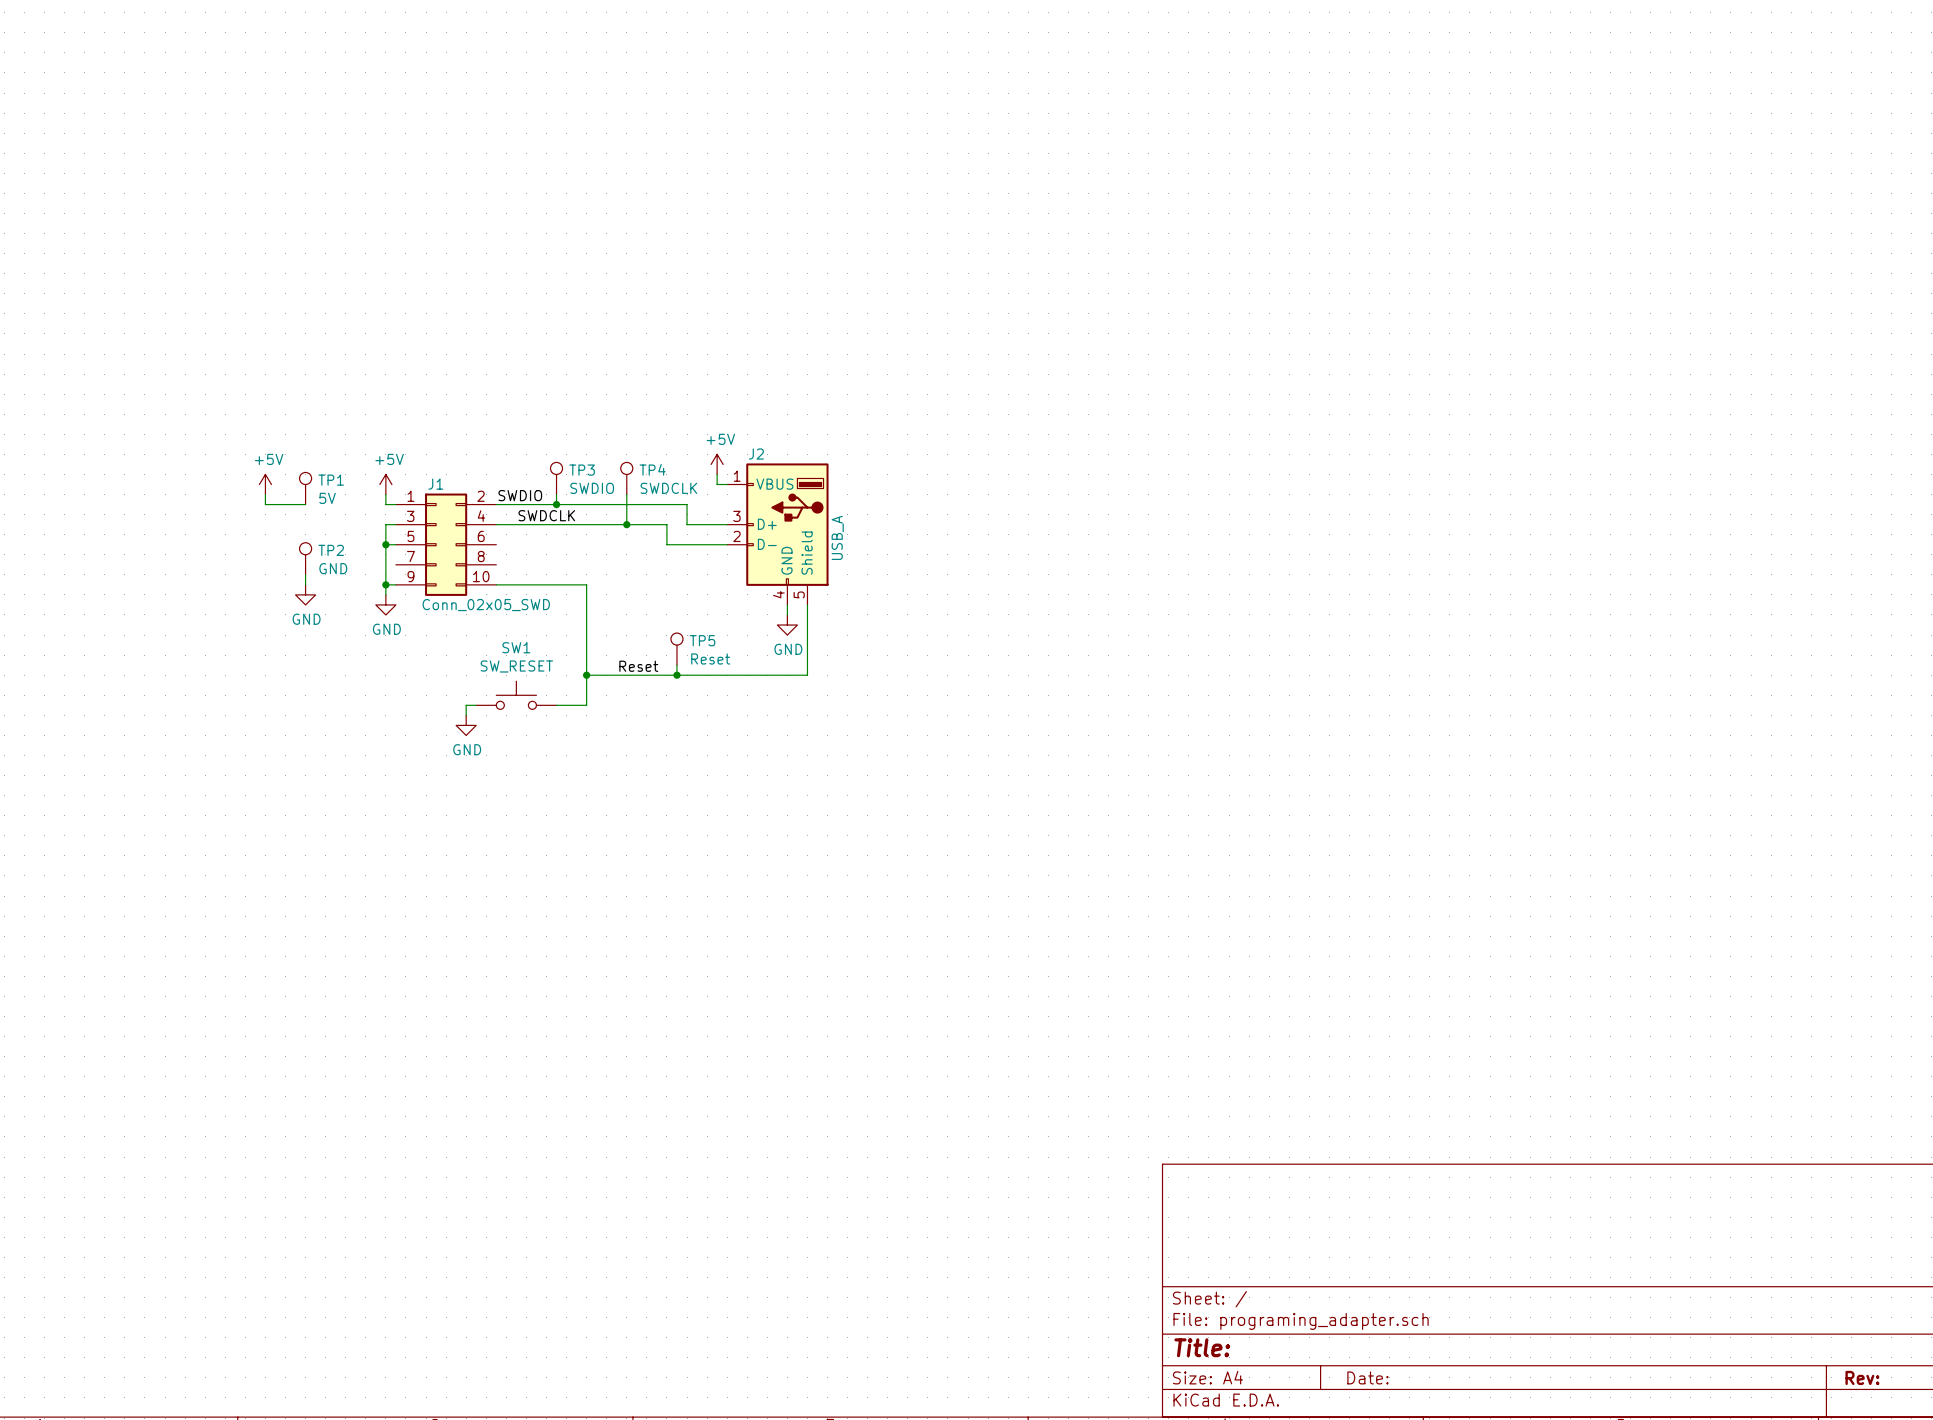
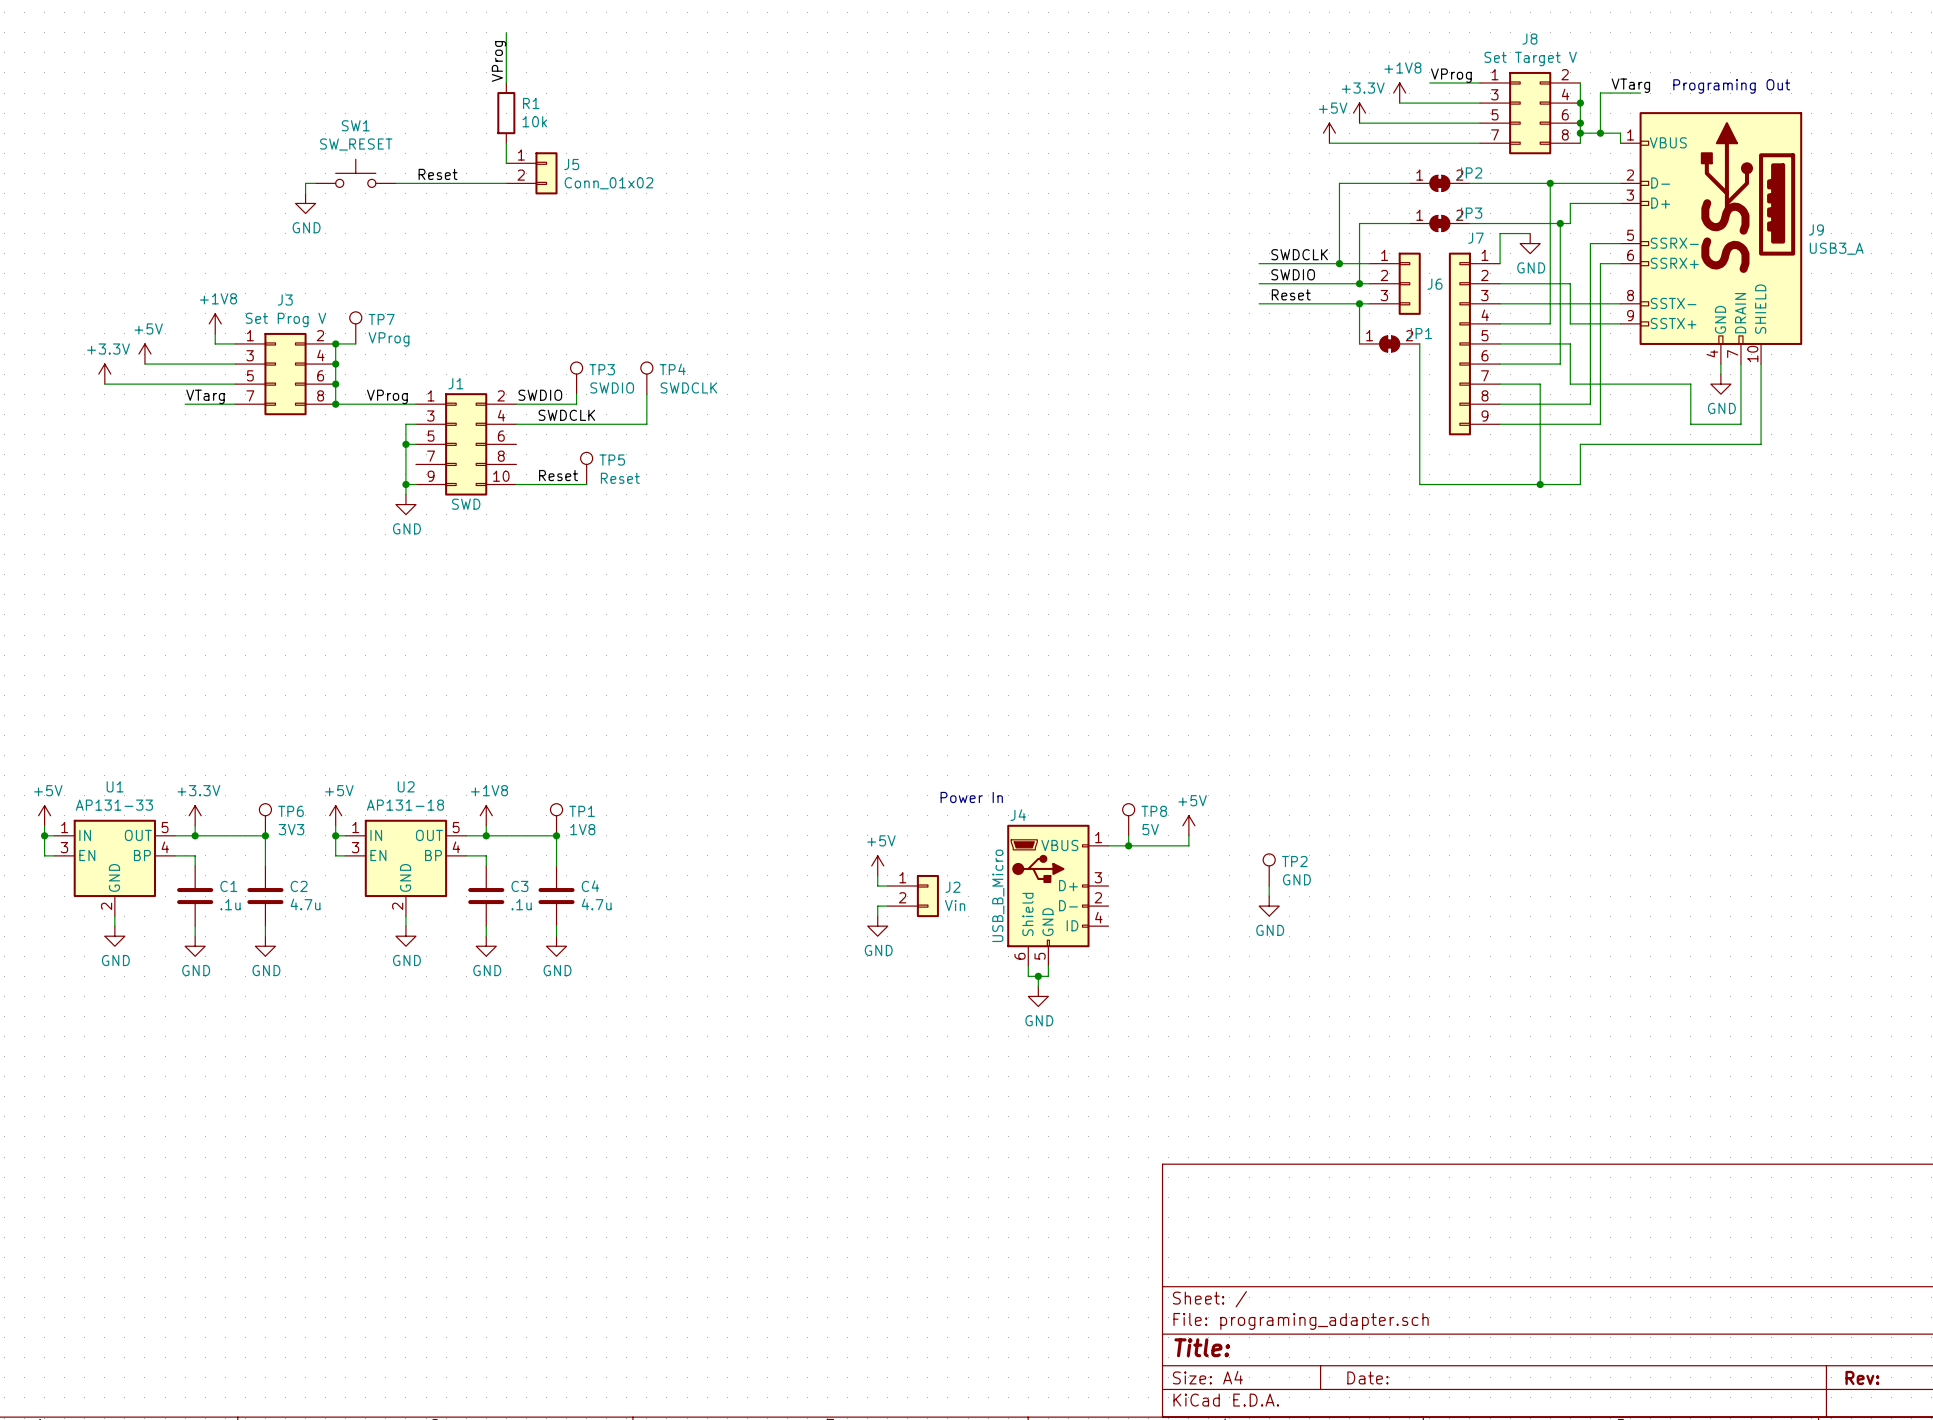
wire: none -> (506, 32) (506, 82)
label: none -> VProg (499, 61)
label: none -> VProg (1451, 75)
wire: none -> (1429, 82) (1479, 82)
wire: none -> (1580, 82) (1580, 143)
label: none -> VTarg (1630, 85)
text: none -> Programing Out (1731, 86)
power symbol: none -> +1V8 (1399, 93)
wire: none -> (1640, 93) (1600, 93) (1600, 133)
wire: none -> (1399, 103) (1479, 103)
junction: none -> (1580, 103)
R1: none -> 10k (506, 113)
power symbol: none -> +3.3V (1359, 113)
J8: none -> Set Target V (1530, 113)
wire: none -> (1359, 123) (1479, 123)
junction: none -> (1580, 123)
power symbol: none -> +5V (1329, 133)
wire: none -> (1580, 133) (1620, 133) (1620, 143)
junction: none -> (1580, 133)
junction: none -> (1600, 133)
wire: none -> (506, 143) (506, 163)
wire: none -> (1329, 143) (1479, 143)
J5: none -> Conn_01x02 (531, 173)
label: none -> Reset (438, 174)
wire: none -> (315, 183) (305, 183) (305, 193)
wire: none -> (395, 183) (506, 183)
wire: none -> (1409, 183) (1339, 183) (1339, 263)
JP2: none -> (1439, 183)
wire: none -> (1469, 183) (1620, 183)
wire: none -> (1550, 183) (1550, 323) (1500, 323)
junction: none -> (1550, 183)
power symbol: none -> GND (305, 203)
wire: none -> (1620, 203) (1570, 203) (1570, 223) (1469, 223)
wire: none -> (1409, 223) (1359, 223) (1359, 283)
JP3: none -> (1439, 223)
wire: none -> (1560, 223) (1560, 364) (1500, 364)
junction: none -> (1560, 223)
wire: none -> (1530, 233) (1500, 233) (1500, 263)
J9: none -> USB3_A (1711, 238)
power symbol: none -> GND (1530, 243)
wire: none -> (1620, 243) (1590, 243) (1590, 404) (1500, 404)
label: none -> SWDCLK (1299, 254)
wire: none -> (1259, 263) (1369, 263)
junction: none -> (1339, 263)
wire: none -> (1620, 263) (1600, 263) (1600, 424) (1500, 424)
label: none -> SWDIO (1293, 274)
wire: none -> (1259, 283) (1369, 283)
junction: none -> (1359, 283)
J6: none -> (1395, 283)
wire: none -> (1500, 283) (1570, 283) (1570, 323) (1620, 323)
label: none -> Reset (1291, 294)
wire: none -> (1259, 303) (1369, 303)
wire: none -> (1359, 303) (1359, 343)
junction: none -> (1359, 303)
wire: none -> (1500, 303) (1620, 303)
power symbol: none -> +1V8 (215, 323)
TP7: none -> VProg (355, 327)
wire: none -> (215, 333) (215, 343) (235, 343)
junction: none -> (335, 343)
wire: none -> (355, 343) (335, 343) (335, 404) (415, 404)
JP1: none -> (1389, 343)
wire: none -> (1419, 343) (1419, 484) (1580, 484) (1580, 444) (1761, 444) (1761, 364)
J7: none -> (1474, 343)
wire: none -> (1500, 343) (1570, 343) (1570, 384) (1690, 384) (1690, 424) (1740, 424) (1740, 364)
power symbol: none -> +5V (144, 354)
wire: none -> (144, 364) (235, 364)
junction: none -> (335, 364)
wire: none -> (1720, 364) (1720, 374)
power symbol: none -> +3.3V (104, 374)
J3: none -> Set Prog V (285, 374)
wire: none -> (104, 384) (235, 384)
junction: none -> (335, 384)
wire: none -> (1500, 384) (1540, 384) (1540, 484)
power symbol: none -> GND (1720, 384)
wire: none -> (576, 394) (576, 404) (516, 404)
wire: none -> (646, 394) (646, 424) (516, 424)
label: none -> VTarg (205, 396)
label: none -> VProg (387, 396)
wire: none -> (185, 404) (235, 404)
junction: none -> (335, 404)
junction: none -> (405, 444)
J2 name position: J2 (756, 454) -> J2 (952, 887)
J2 symbol: [727, 463, 829, 605] -> [887, 874, 939, 918]
power symbol: +5V (717, 464) -> none
wire: (717, 474) (717, 484) (727, 484) -> none
label: none -> Reset (558, 475)
TP3 position: (556, 478) -> (576, 378)
TP4 position: (626, 478) -> (646, 378)
power symbol: +5V (265, 484) -> none
power symbol: +5V (385, 484) -> none
junction: none -> (405, 484)
wire: none -> (516, 484) (586, 484)
junction: none -> (1540, 484)
TP1 position: (305, 488) -> (556, 819)
wire: (265, 494) (265, 504) (305, 504) -> none
wire: (385, 494) (385, 504) (395, 504) -> none
wire: (556, 494) (556, 504) -> none
wire: (626, 494) (626, 524) -> none
label position: SWDIO (520, 495) -> SWDIO (540, 395)
TP1 value: 5V (327, 498) -> 1V8 (582, 829)
power symbol: none -> GND (405, 504)
wire: (496, 504) (687, 504) (687, 524) (727, 524) -> none
junction: (556, 504) -> none
label position: SWDCLK (546, 515) -> SWDCLK (566, 415)
wire: (395, 524) (385, 524) (385, 594) -> (415, 424) (405, 424) (405, 494)
wire: (496, 524) (666, 524) (666, 544) (727, 544) -> none
junction: (626, 524) -> none
J2 value: USB_A (837, 537) -> Vin (955, 905)
wire: (385, 544) (395, 544) -> (405, 444) (415, 444)
junction: (385, 544) -> none
J1 position: (446, 544) -> (466, 444)
TP2 position: (305, 558) -> (1269, 869)
wire: (305, 574) (305, 584) -> none
wire: (385, 584) (395, 584) -> (405, 484) (415, 484)
junction: (385, 584) -> none
wire: (496, 584) (586, 584) (586, 705) (556, 705) -> none
power symbol: GND (305, 594) -> none
power symbol: GND (385, 604) -> none
wire: (787, 604) (787, 614) -> none
wire: (807, 604) (807, 675) (586, 675) -> none
J1 value: Conn_02x05_SWD (486, 605) -> SWD (466, 504)
power symbol: GND (787, 625) -> none
TP5 position: (676, 649) -> (586, 468)
wire: (676, 665) (676, 675) -> none
label: Reset (638, 666) -> none
junction: (586, 675) -> none
junction: (676, 675) -> none
SW1 position: (516, 695) -> (355, 173)
wire: (476, 705) (466, 705) (466, 715) -> none
power symbol: GND (466, 725) -> none
text: none -> Power In (971, 797)
power symbol: none -> +5V (44, 815)
power symbol: none -> +3.3V (195, 815)
power symbol: none -> +5V (335, 815)
power symbol: none -> +1V8 (486, 815)
TP6: none -> 3V3 (265, 819)
TP8: none -> 5V (1128, 819)
wire: none -> (44, 825) (44, 855) (54, 855)
wire: none -> (195, 825) (195, 835)
wire: none -> (335, 825) (335, 855) (345, 855)
wire: none -> (486, 825) (486, 835)
power symbol: none -> +5V (1188, 825)
wire: none -> (44, 835) (54, 835)
junction: none -> (44, 835)
wire: none -> (175, 835) (265, 835) (265, 865)
junction: none -> (195, 835)
junction: none -> (265, 835)
wire: none -> (335, 835) (345, 835)
junction: none -> (335, 835)
wire: none -> (466, 835) (556, 835) (556, 865)
junction: none -> (486, 835)
junction: none -> (556, 835)
wire: none -> (1128, 835) (1128, 845)
wire: none -> (1188, 835) (1188, 845) (1108, 845)
junction: none -> (1128, 845)
wire: none -> (175, 855) (195, 855) (195, 865)
wire: none -> (466, 855) (486, 855) (486, 865)
power symbol: none -> +5V (877, 865)
U1: none -> AP131-33 (114, 867)
U2: none -> AP131-18 (405, 867)
wire: none -> (877, 875) (877, 886) (887, 886)
wire: none -> (1269, 886) (1269, 896)
J4: none -> USB_B_Micro (1057, 895)
C1: none -> .1u (195, 896)
C2: none -> 4.7u (265, 896)
C3: none -> .1u (486, 896)
C4: none -> 4.7u (556, 896)
wire: none -> (887, 906) (877, 906) (877, 916)
power symbol: none -> GND (1269, 906)
wire: none -> (114, 916) (114, 926)
wire: none -> (405, 916) (405, 926)
wire: none -> (195, 926) (195, 936)
wire: none -> (265, 926) (265, 936)
wire: none -> (486, 926) (486, 936)
wire: none -> (556, 926) (556, 936)
power symbol: none -> GND (877, 926)
power symbol: none -> GND (114, 936)
power symbol: none -> GND (405, 936)
power symbol: none -> GND (195, 946)
power symbol: none -> GND (265, 946)
power symbol: none -> GND (486, 946)
power symbol: none -> GND (556, 946)
wire: none -> (1028, 966) (1028, 976) (1048, 976) (1048, 966)
wire: none -> (1038, 976) (1038, 986)
junction: none -> (1038, 976)
power symbol: none -> GND (1038, 996)

